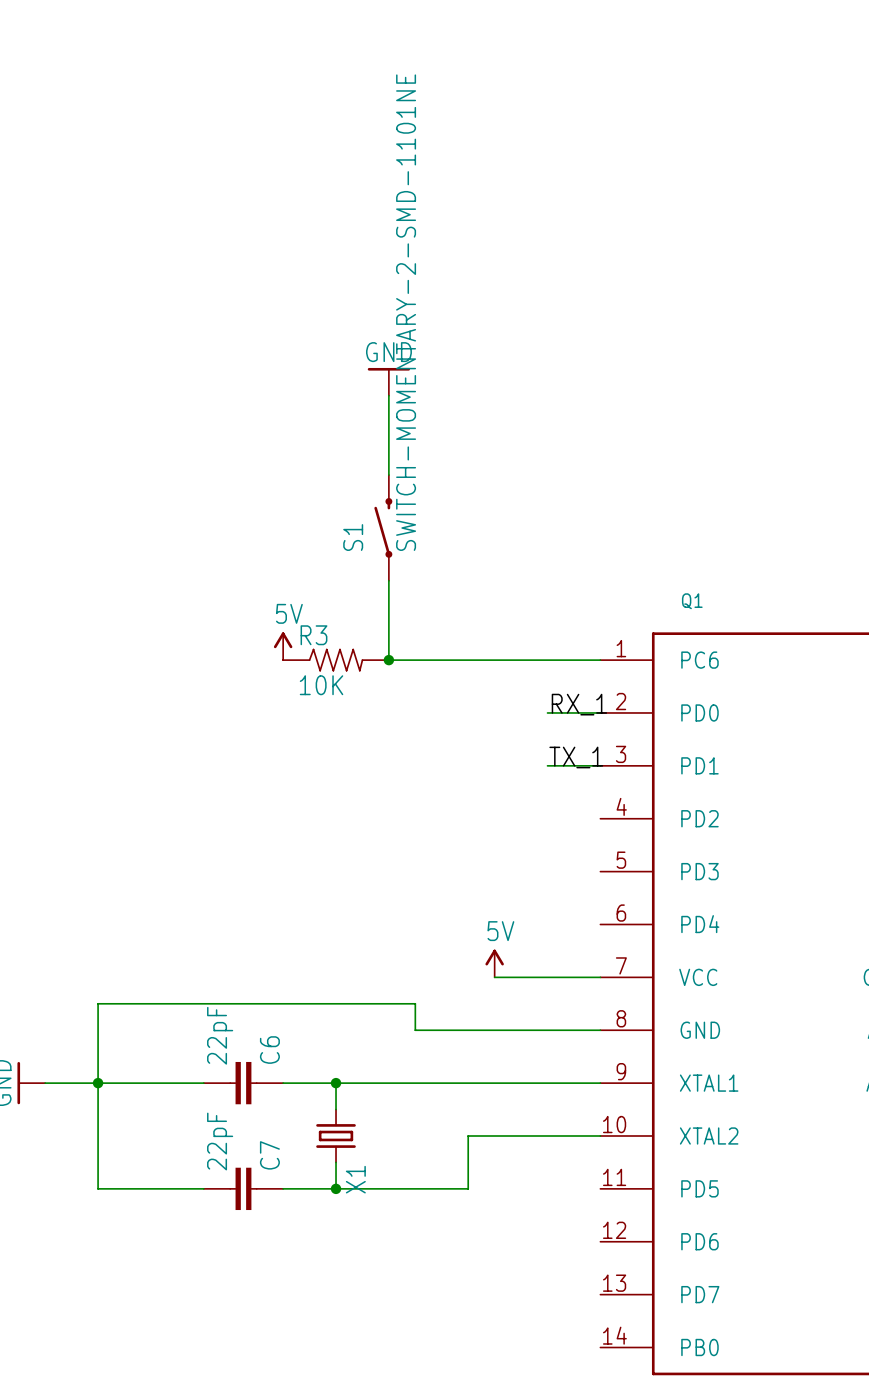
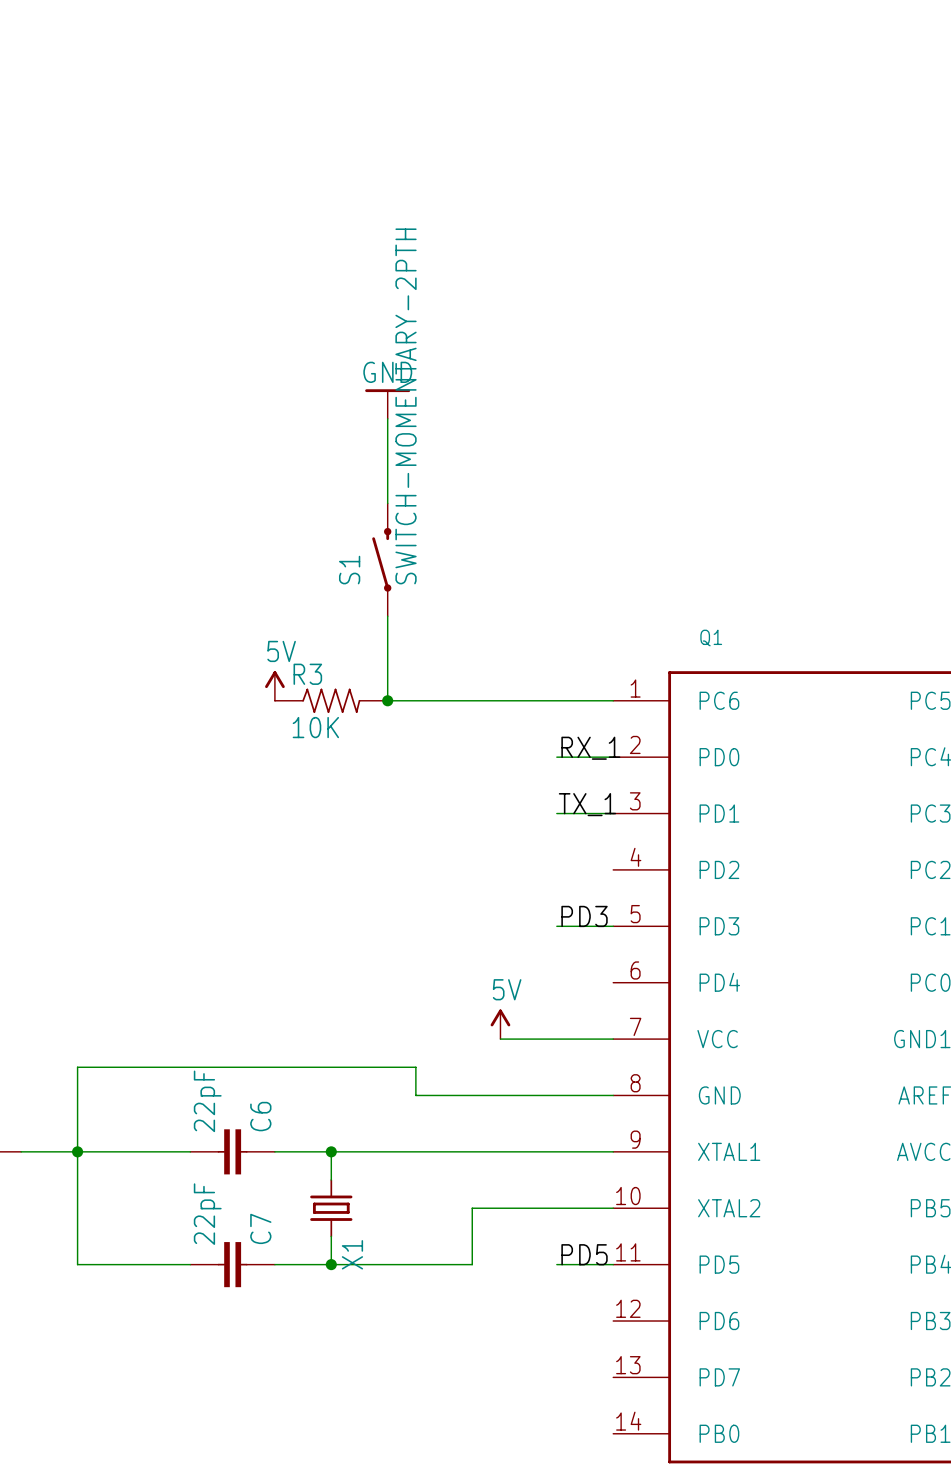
S1 value: SWITCH-MOMENTARY-2-SMD-1101NE (406, 312) -> SWITCH-MOMENTARY-2PTH (406, 406)
label: none -> PD3 (584, 916)
wire: none -> (556, 926) (613, 926)
label: none -> PD5 (584, 1254)
wire: none -> (556, 1264) (613, 1264)

